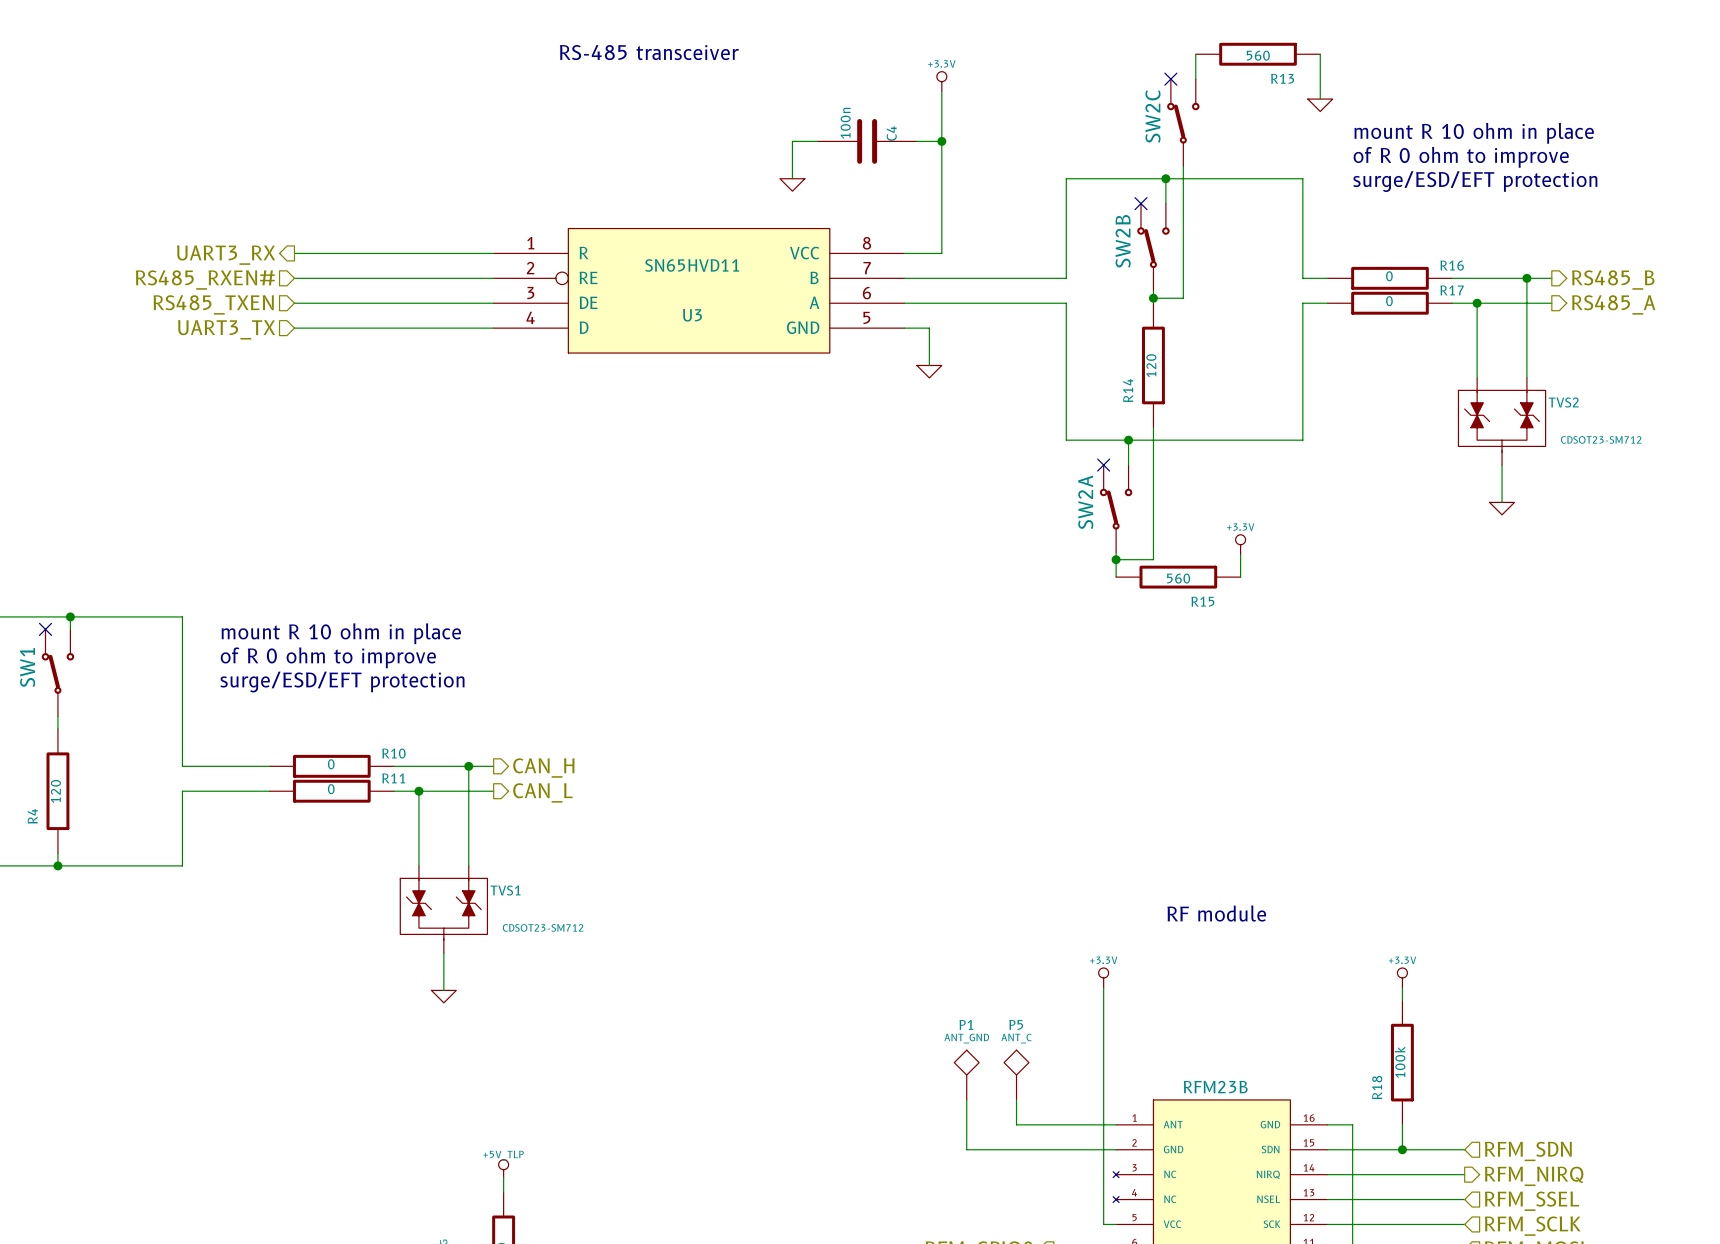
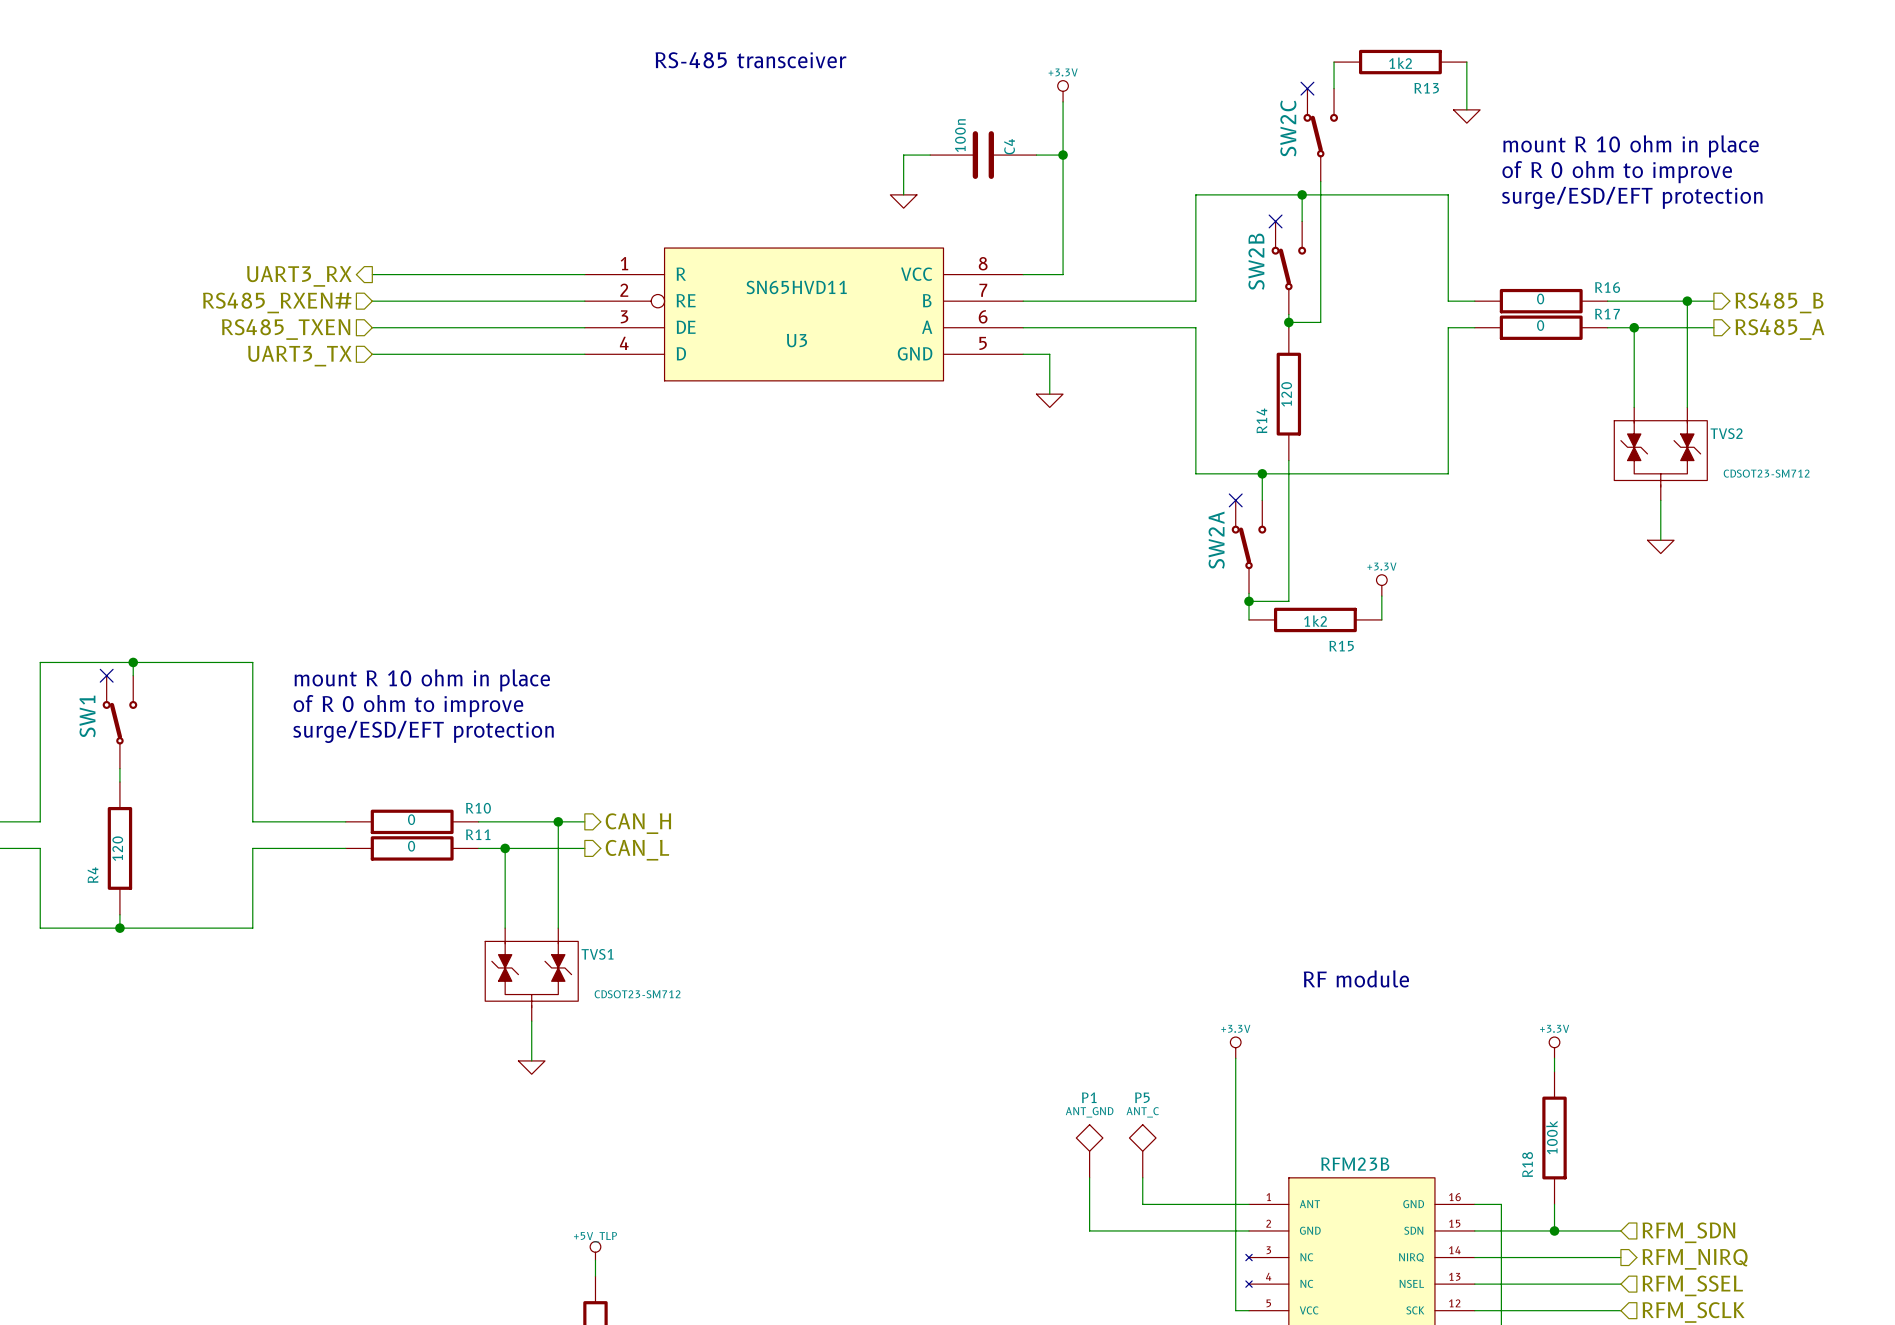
R13 value: 560 (1258, 55) -> 1k2 (1400, 63)
R15 value: 560 (1178, 578) -> 1k2 (1315, 621)

